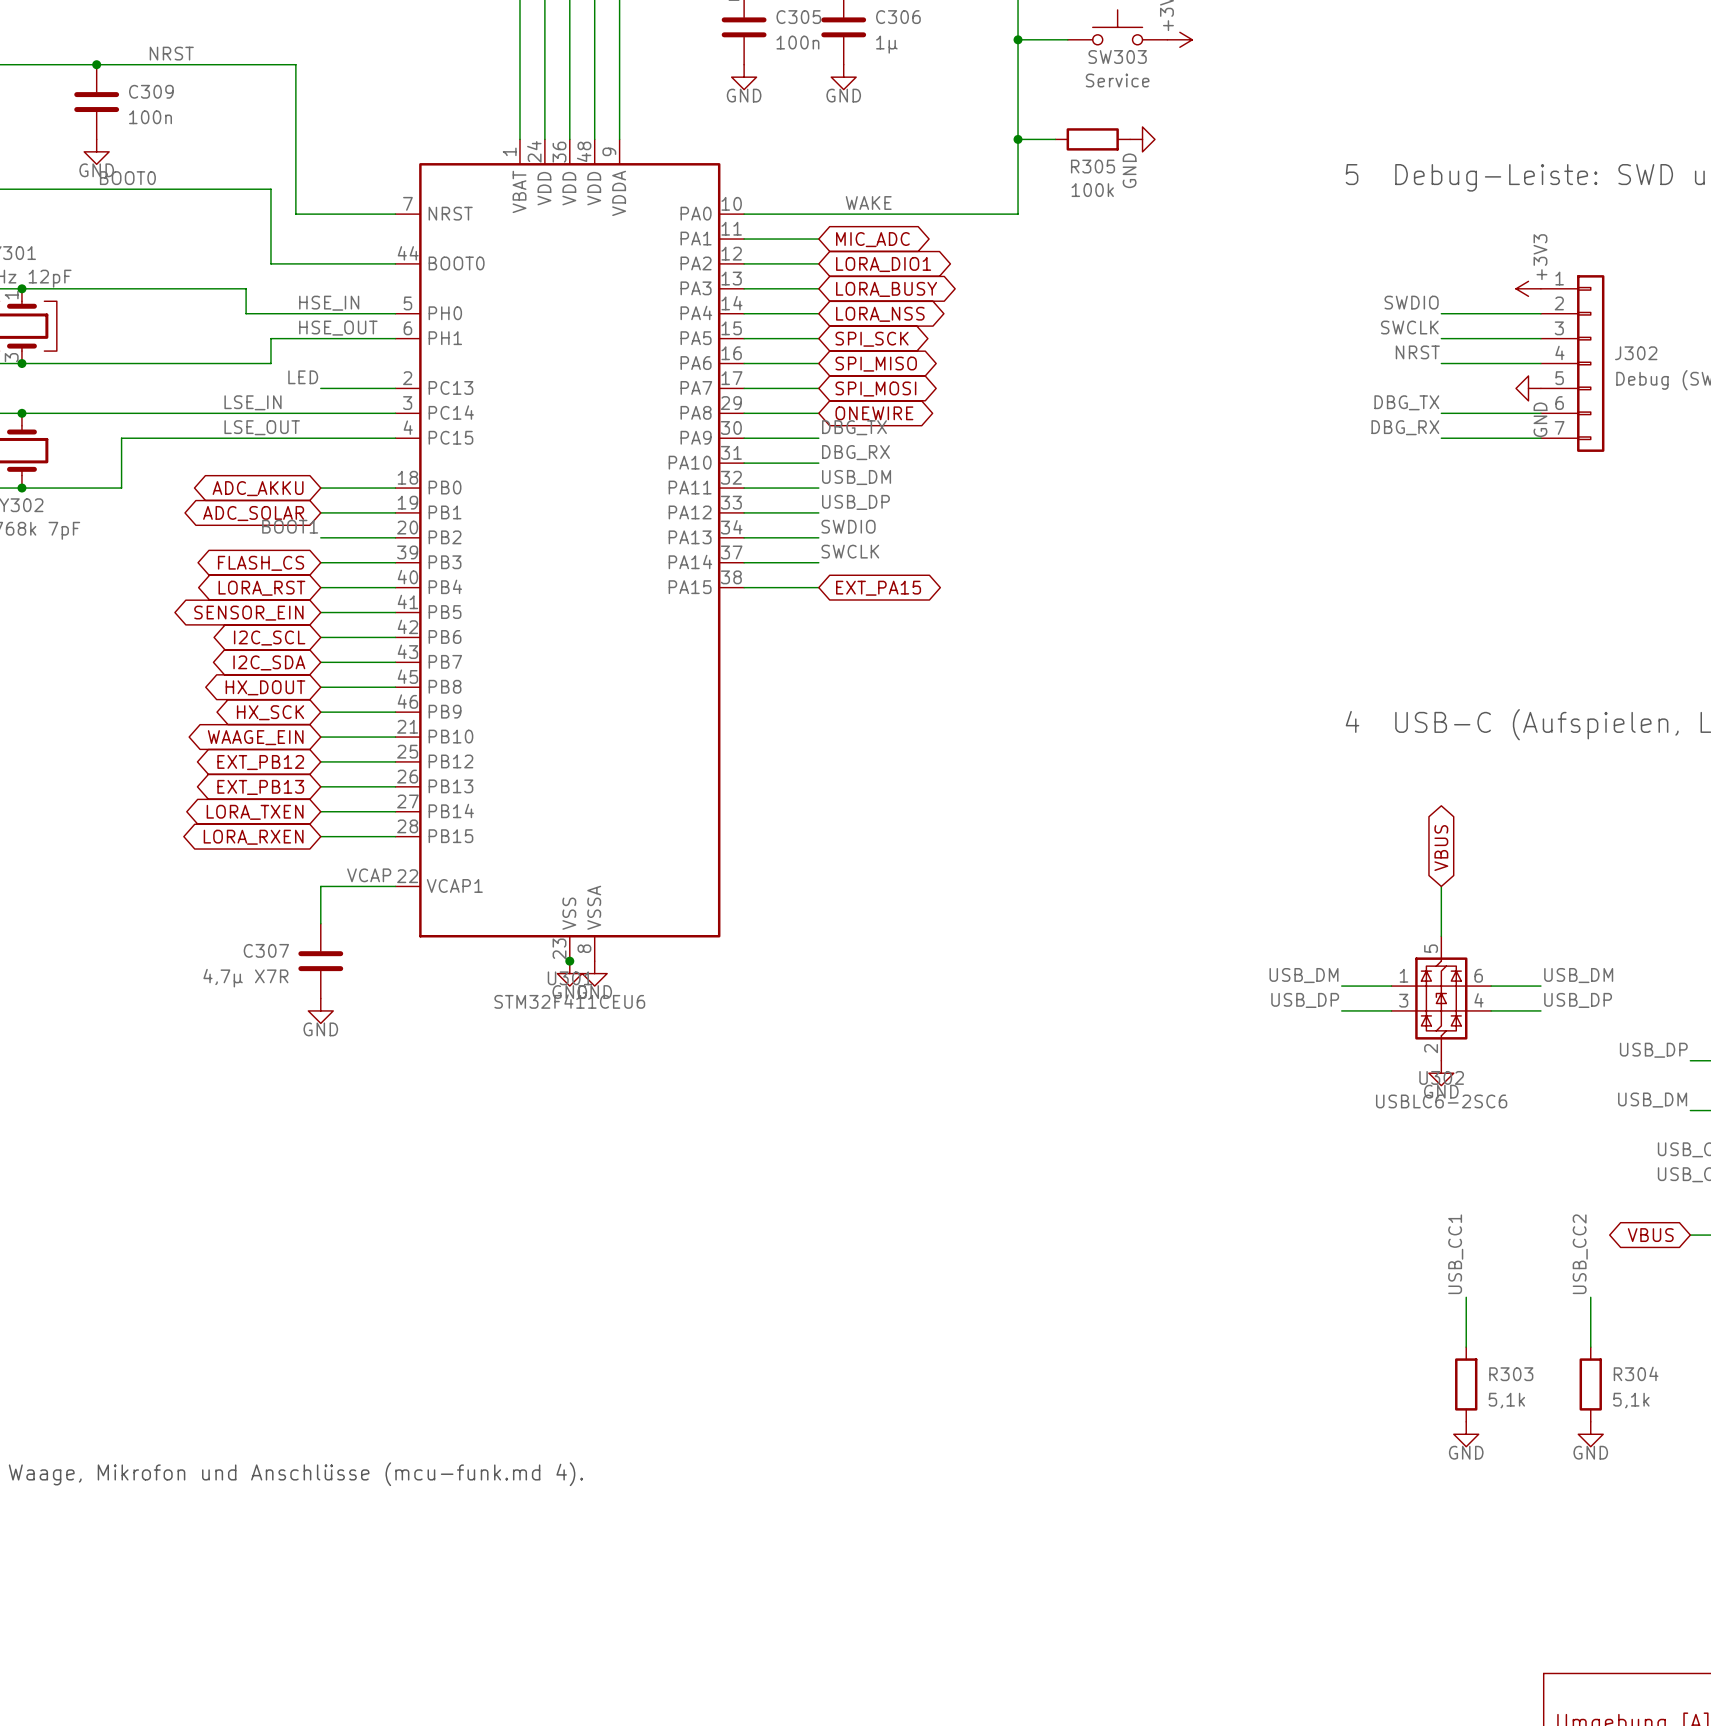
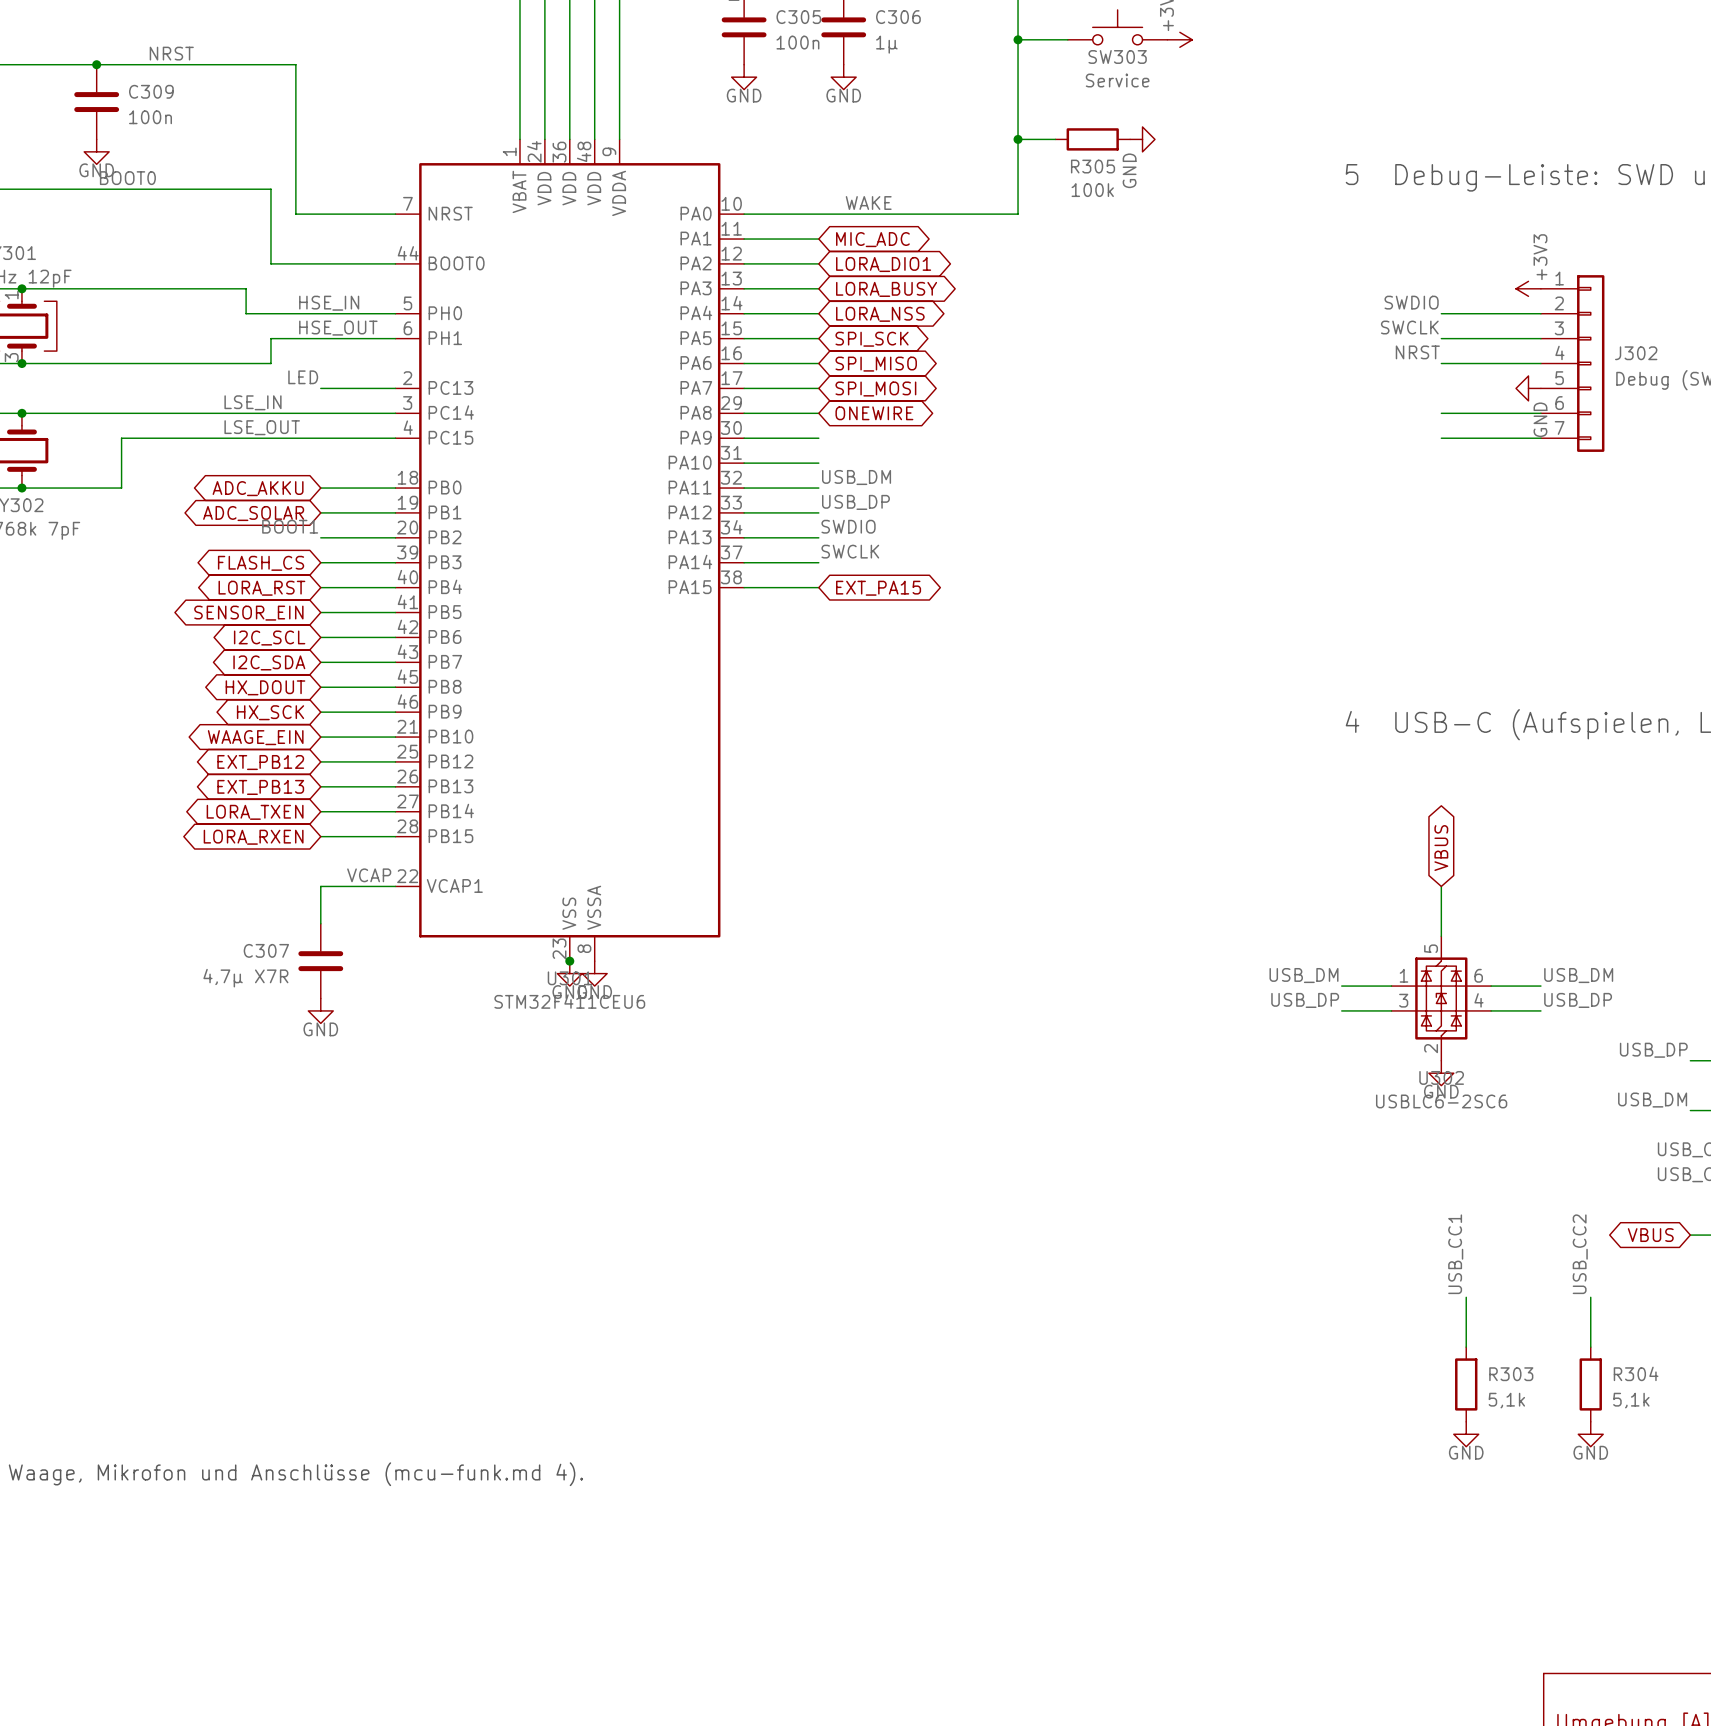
label: DBG_TX (1406, 402) -> none
label: DBG_TX (854, 427) -> none
label: DBG_RX (1405, 427) -> none
label: DBG_RX (855, 452) -> none

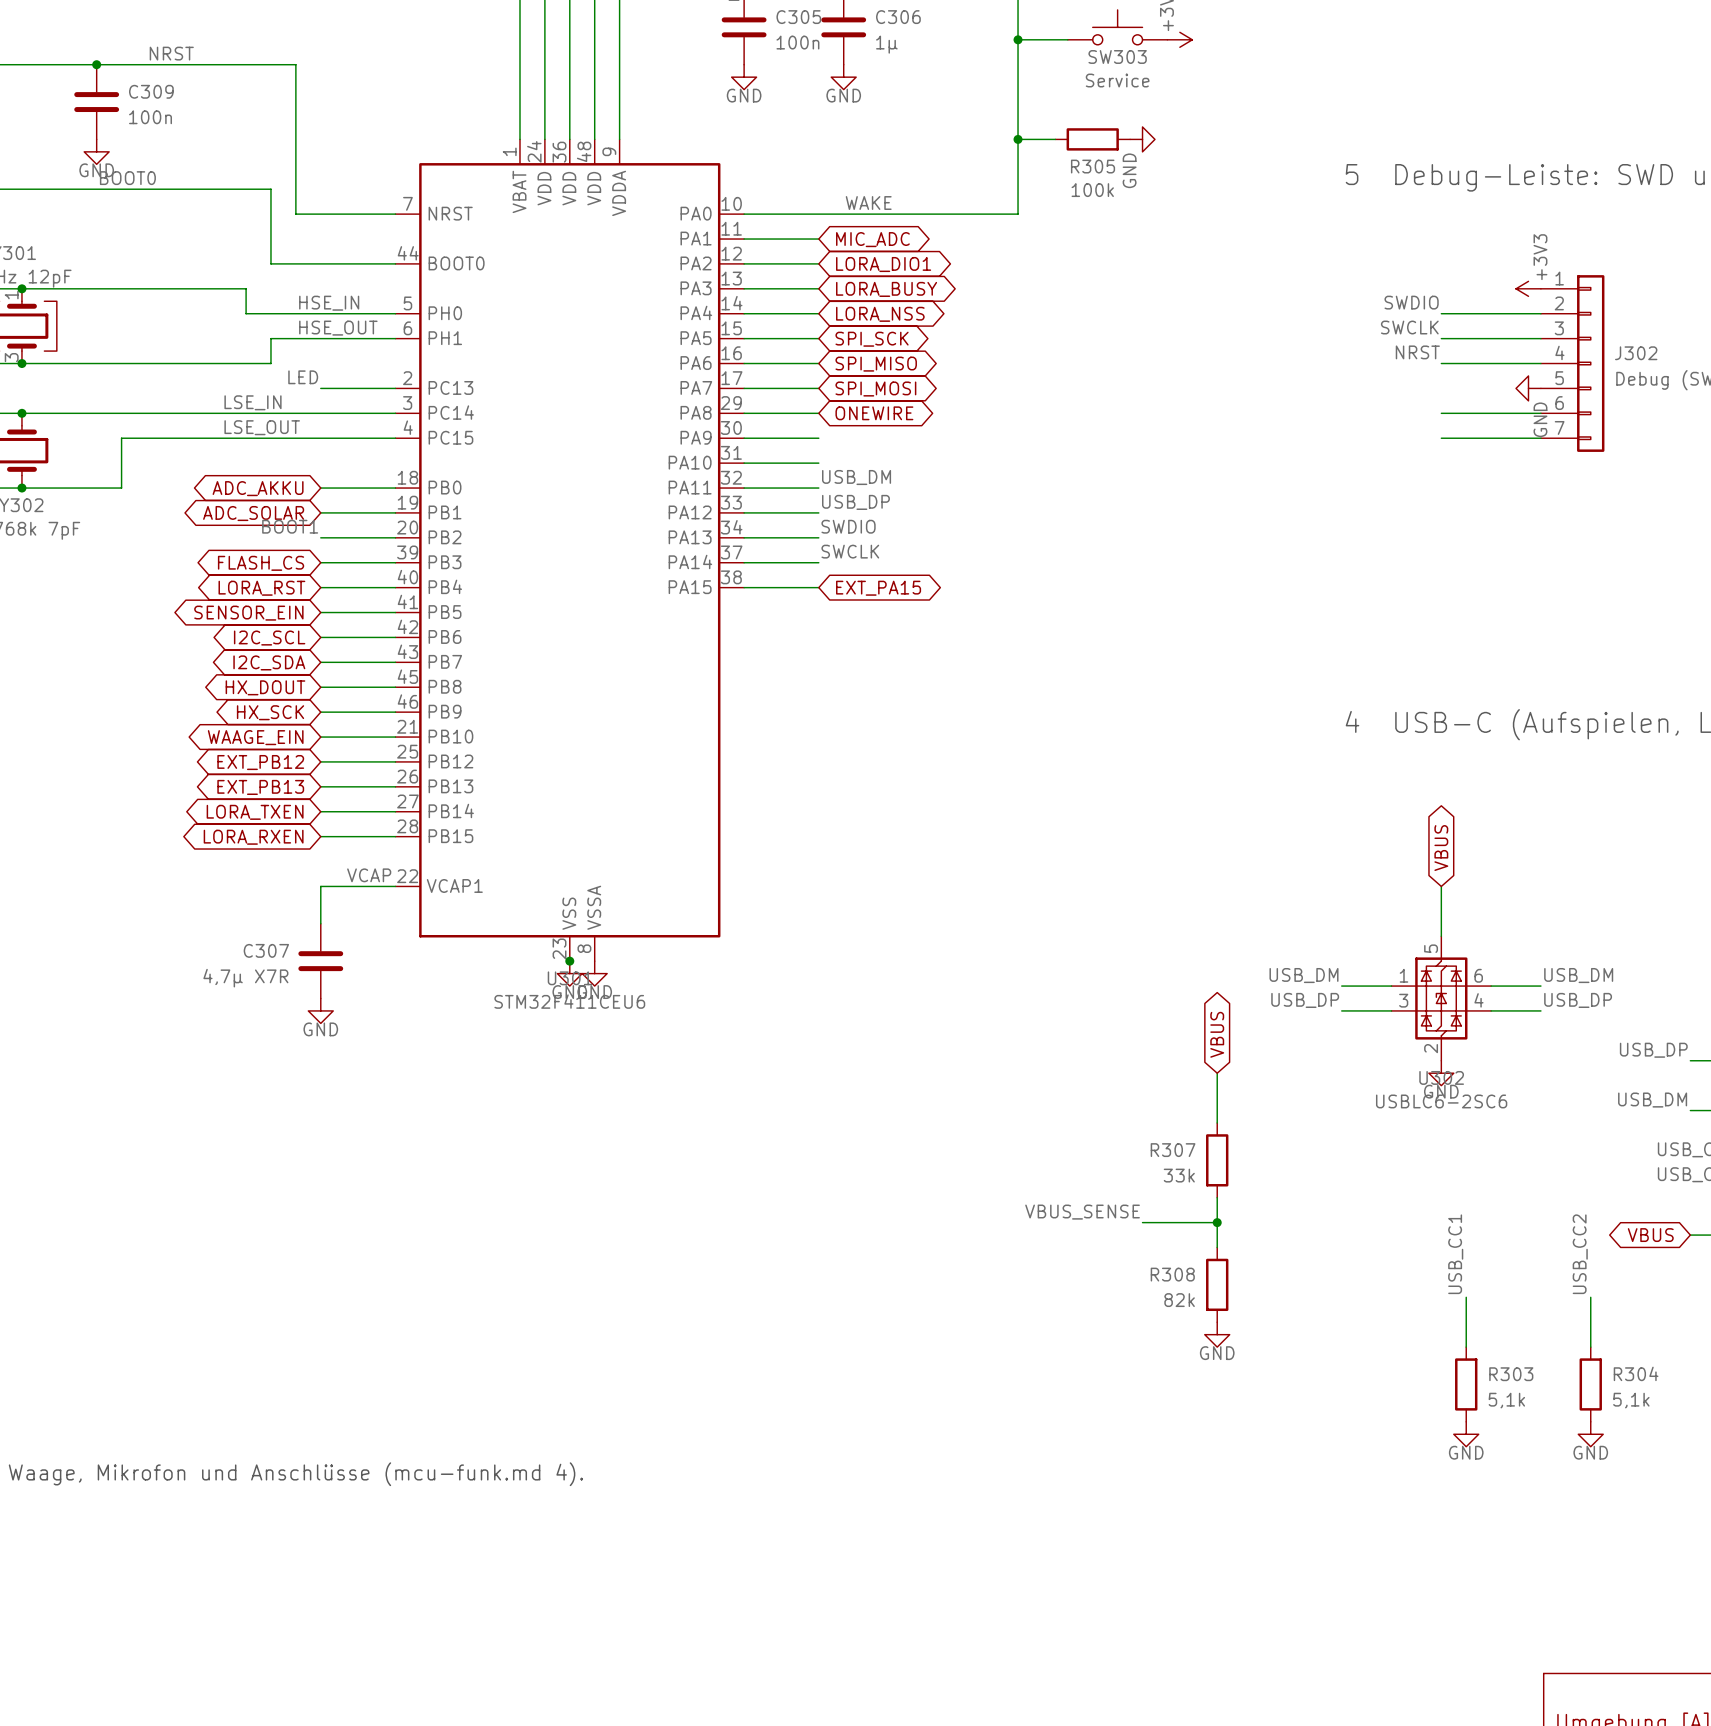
global label: none -> VBUS (1217, 1034)
wire: none -> (1217, 1073) (1217, 1123)
R307: none -> 33k (1217, 1160)
wire: none -> (1217, 1197) (1217, 1247)
label: none -> VBUS_SENSE (1082, 1212)
wire: none -> (1142, 1222) (1217, 1222)
junction: none -> (1217, 1222)
R308: none -> 82k (1217, 1284)
power symbol: none -> GND (1217, 1334)

